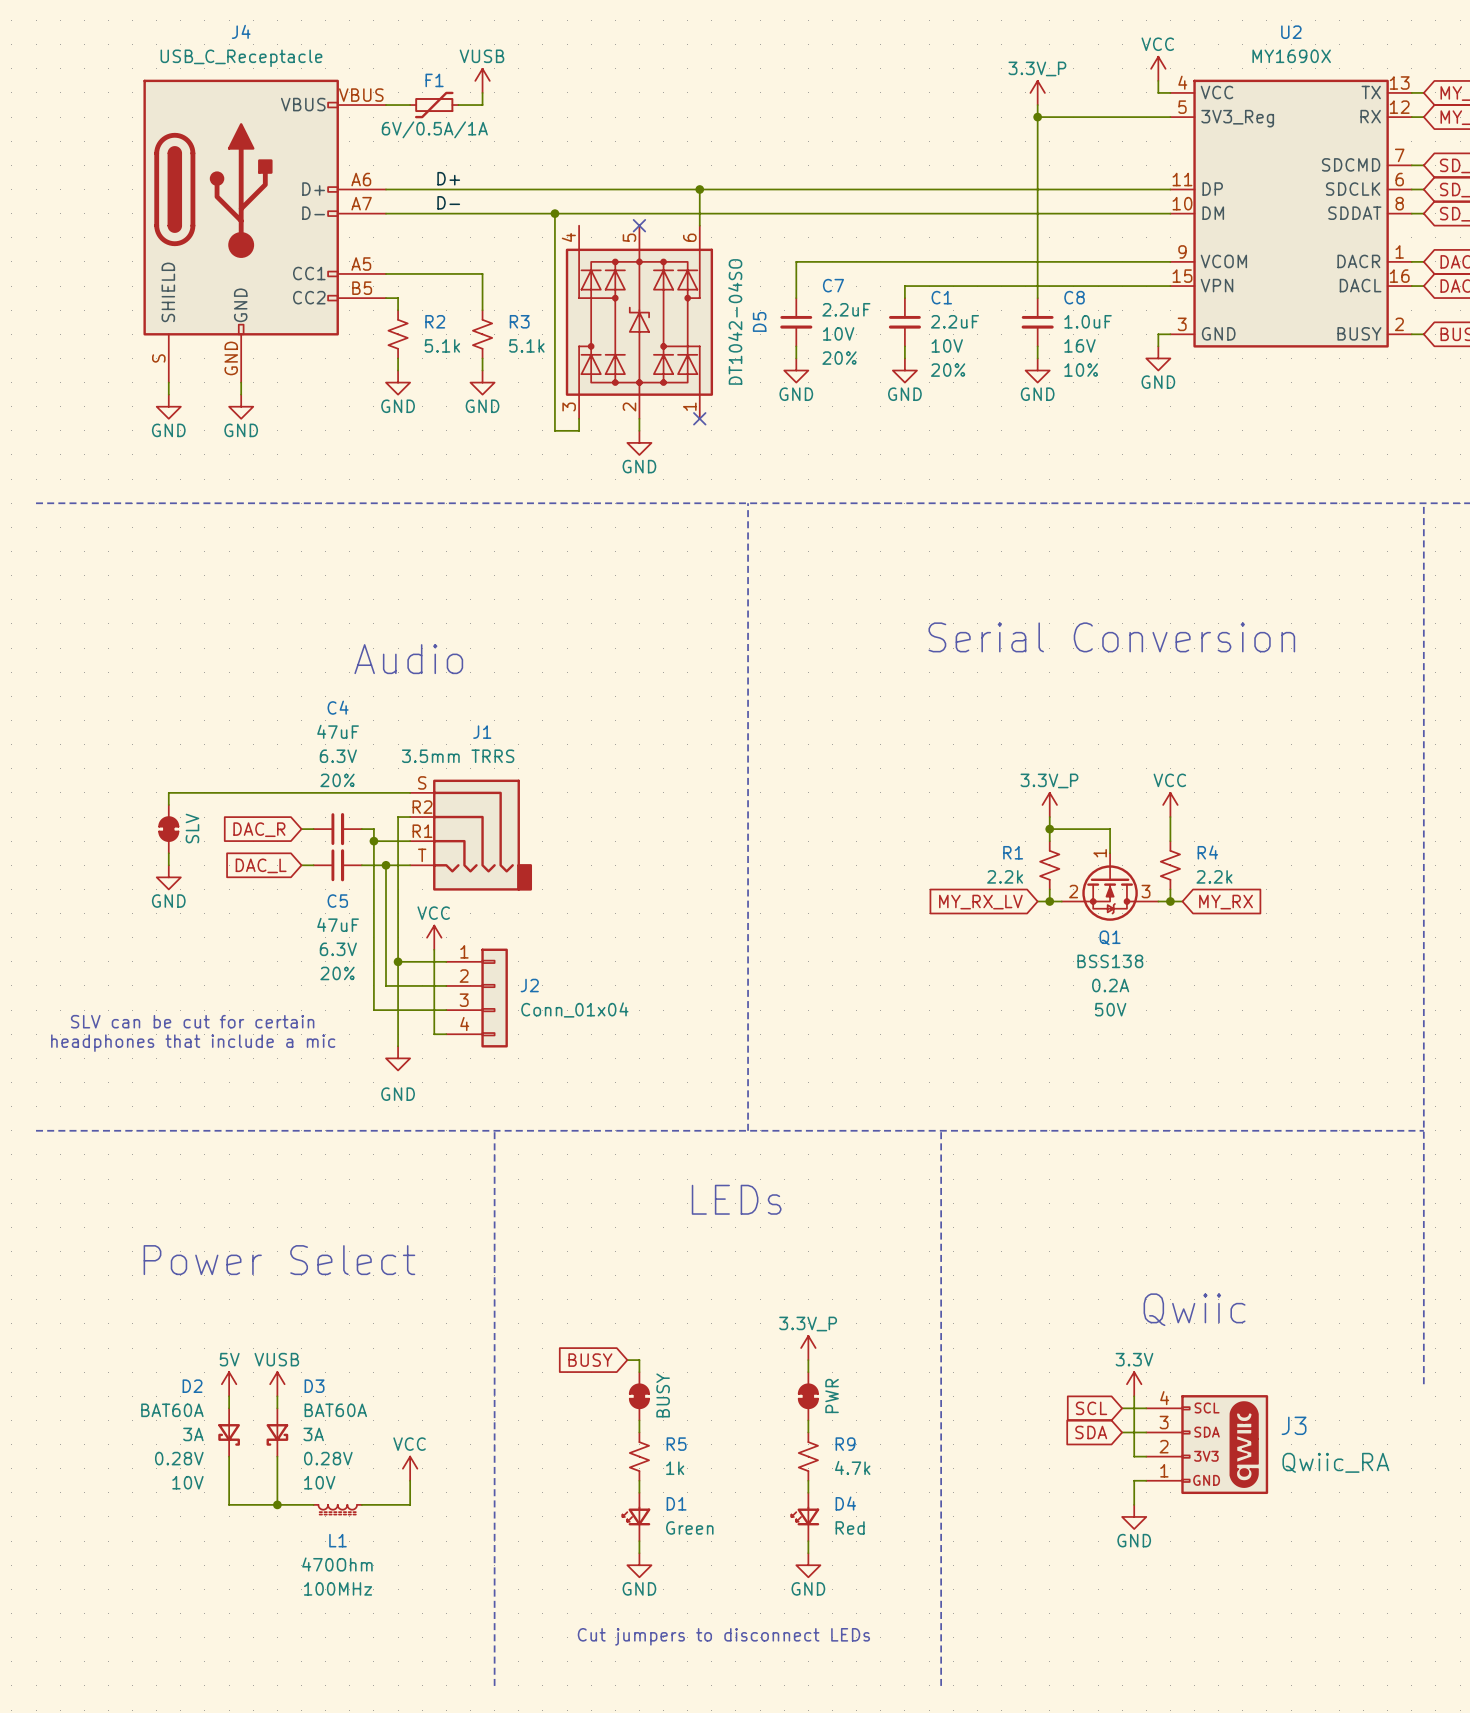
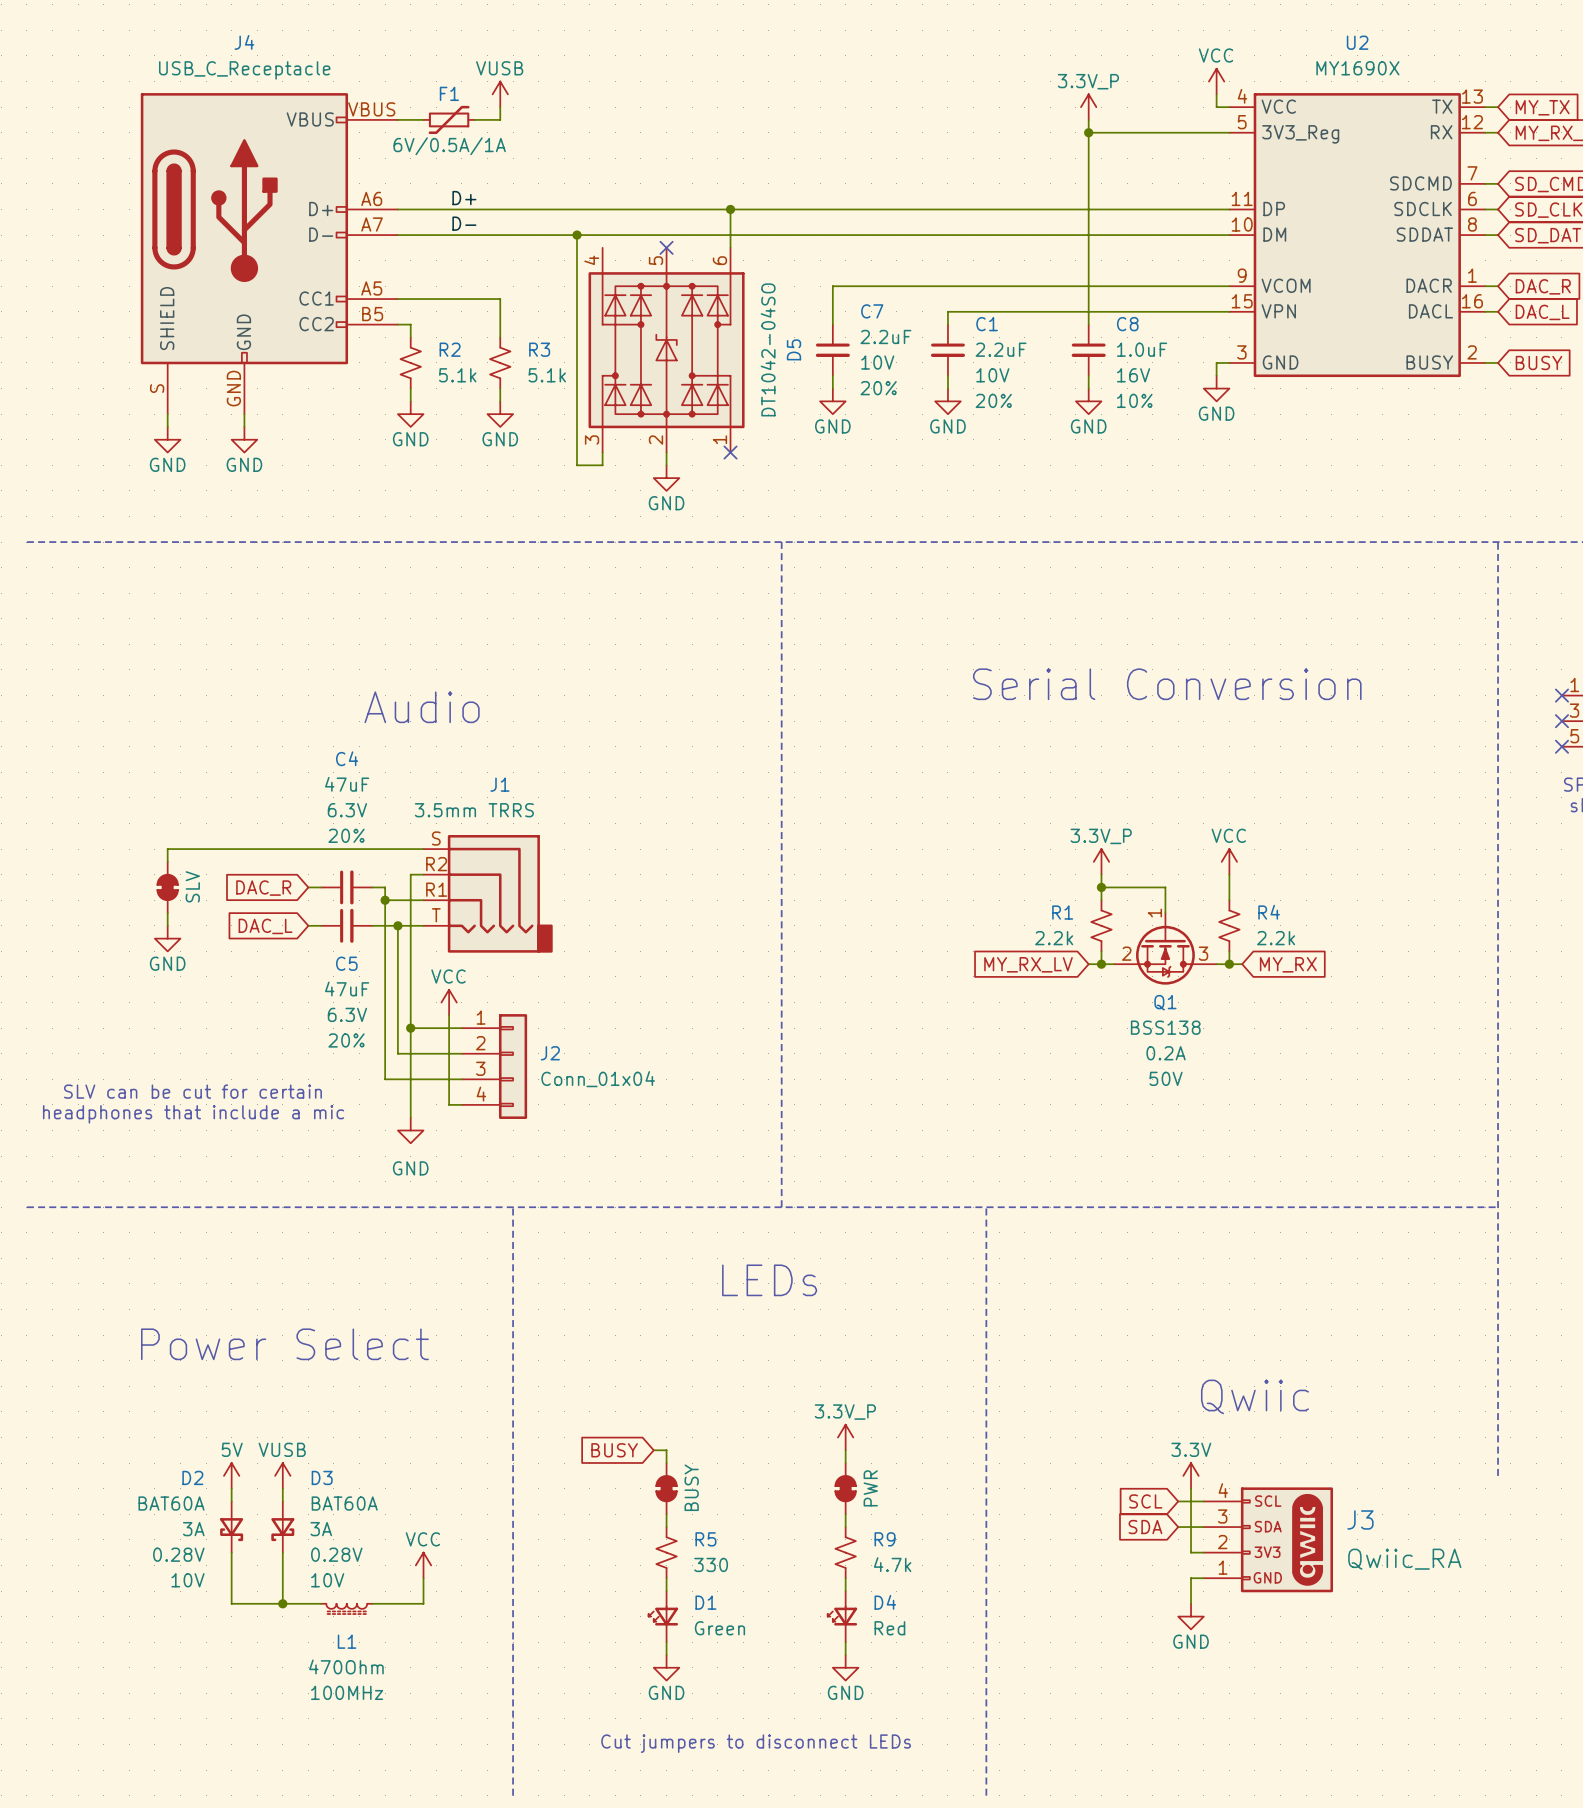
R5 value: 1k (675, 1468) -> 330 (711, 1564)

